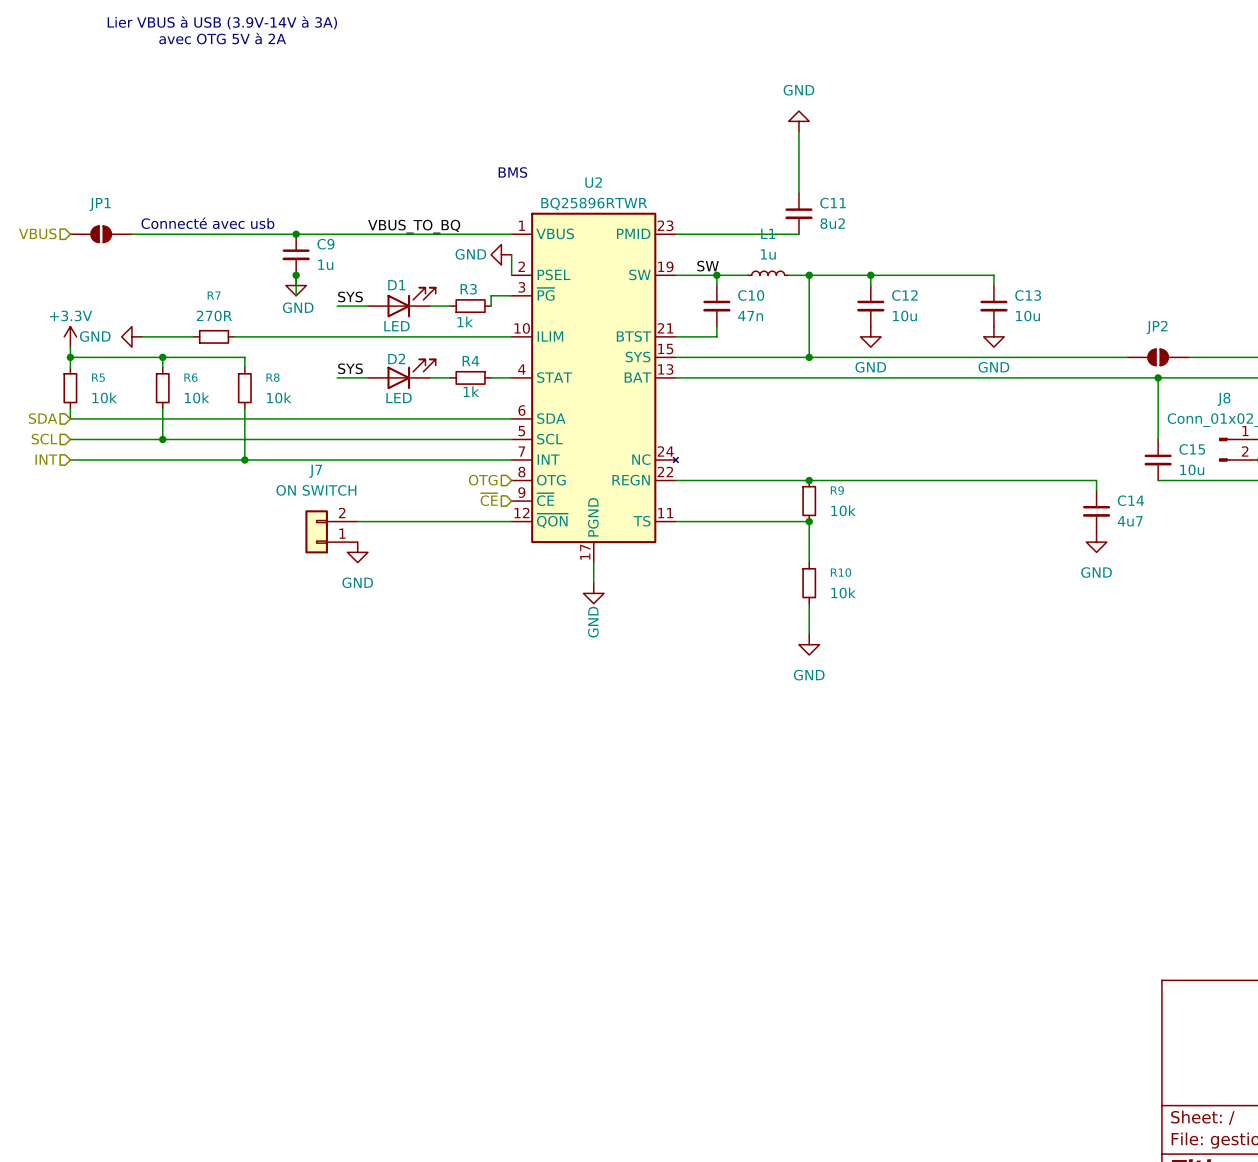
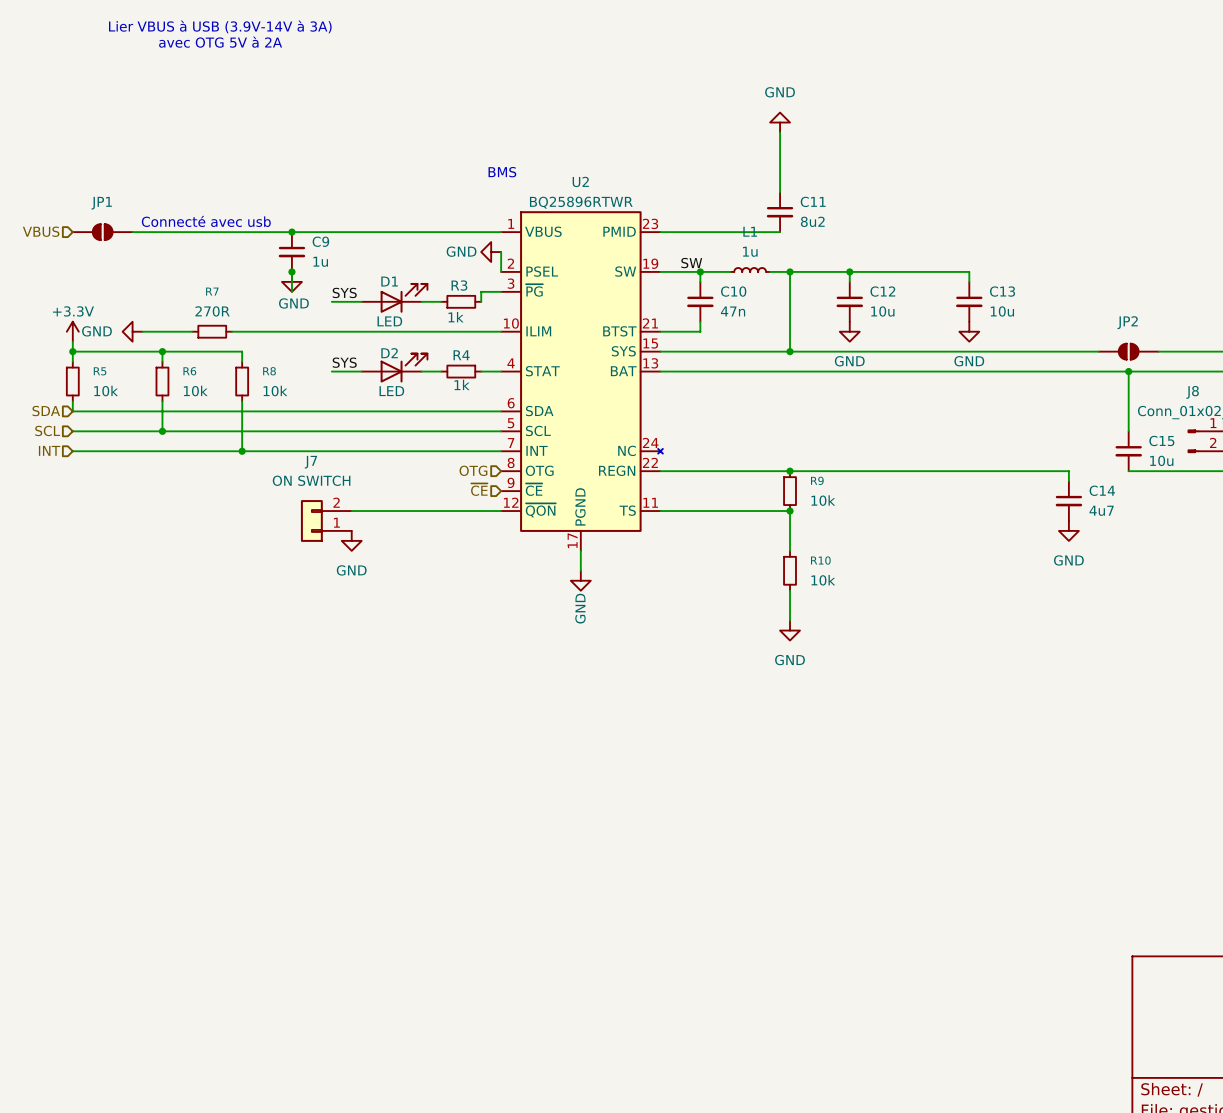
label: VBUS_TO_BQ (414, 226) -> none

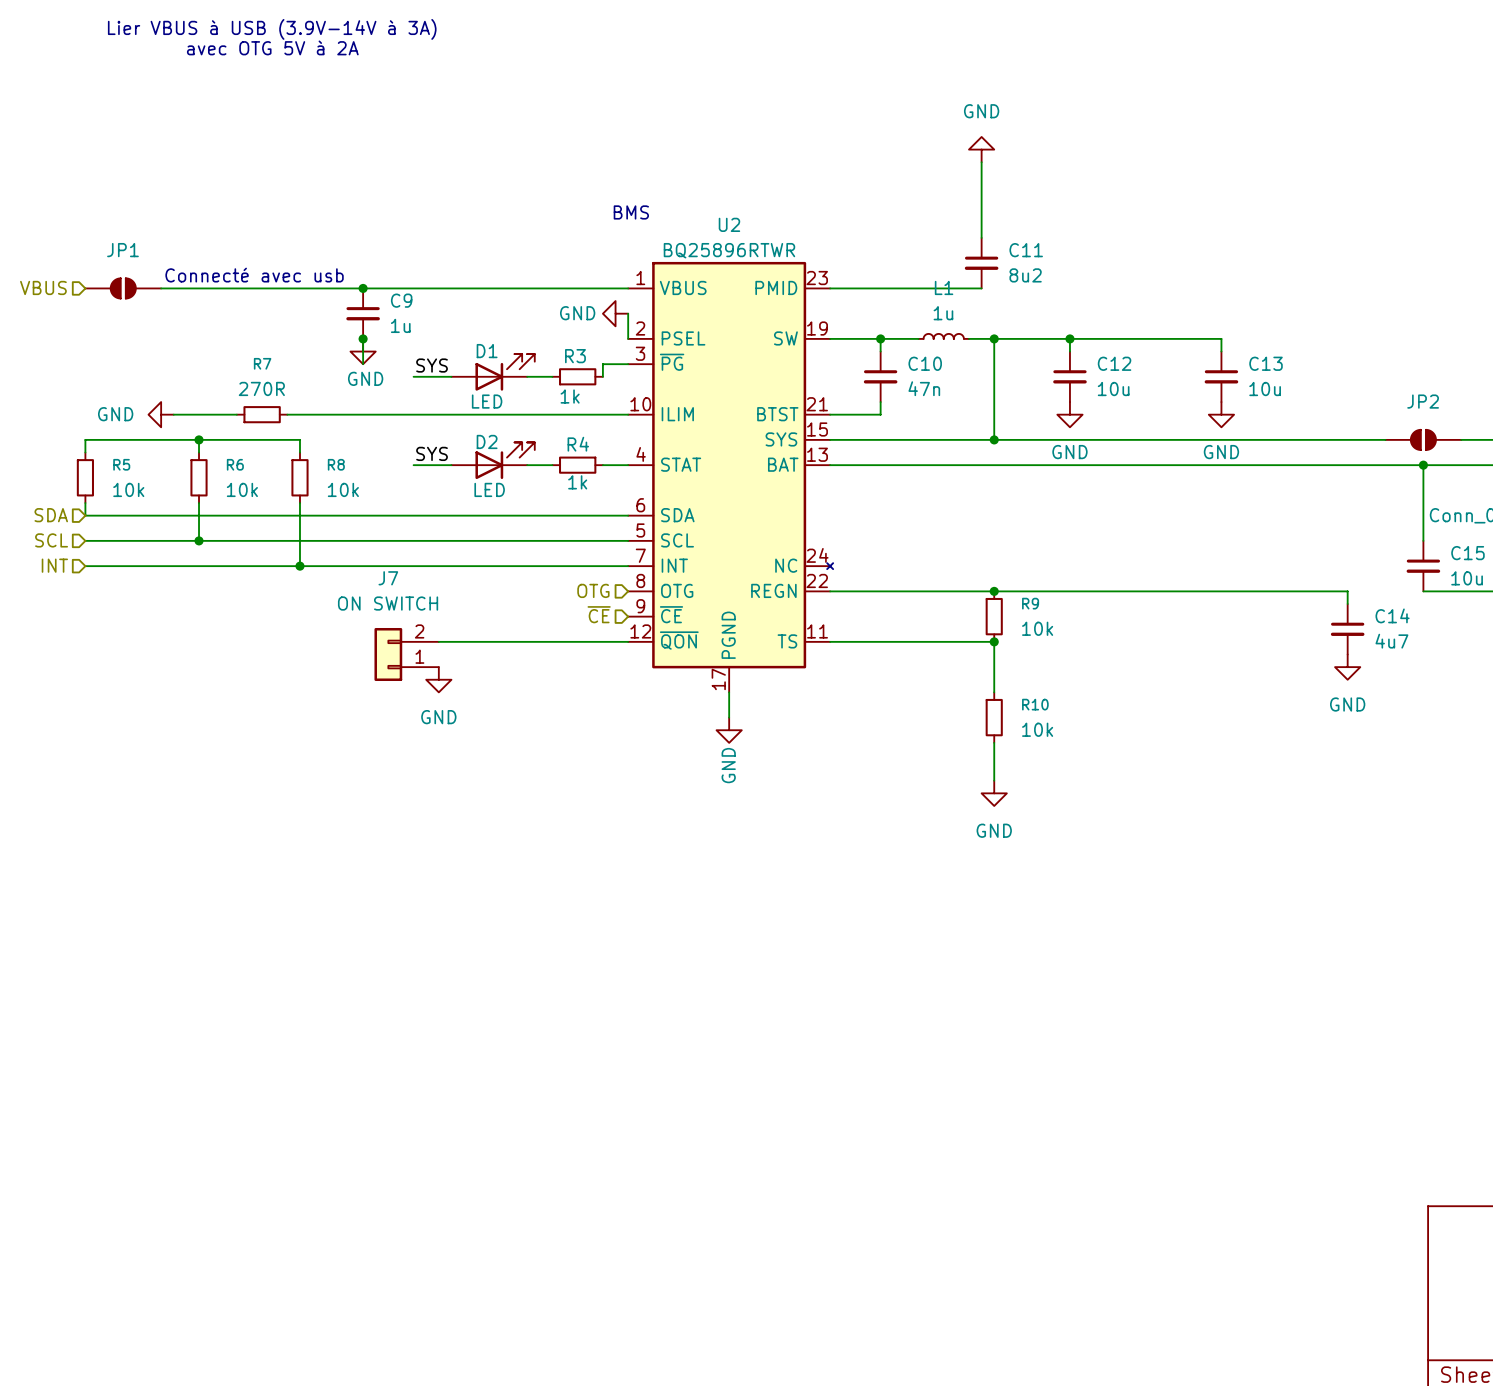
label: SW (691, 263) -> none
power symbol: +3.3V (72, 331) -> none
wire: (72, 341) (72, 351) -> none
junction: (72, 351) -> none

